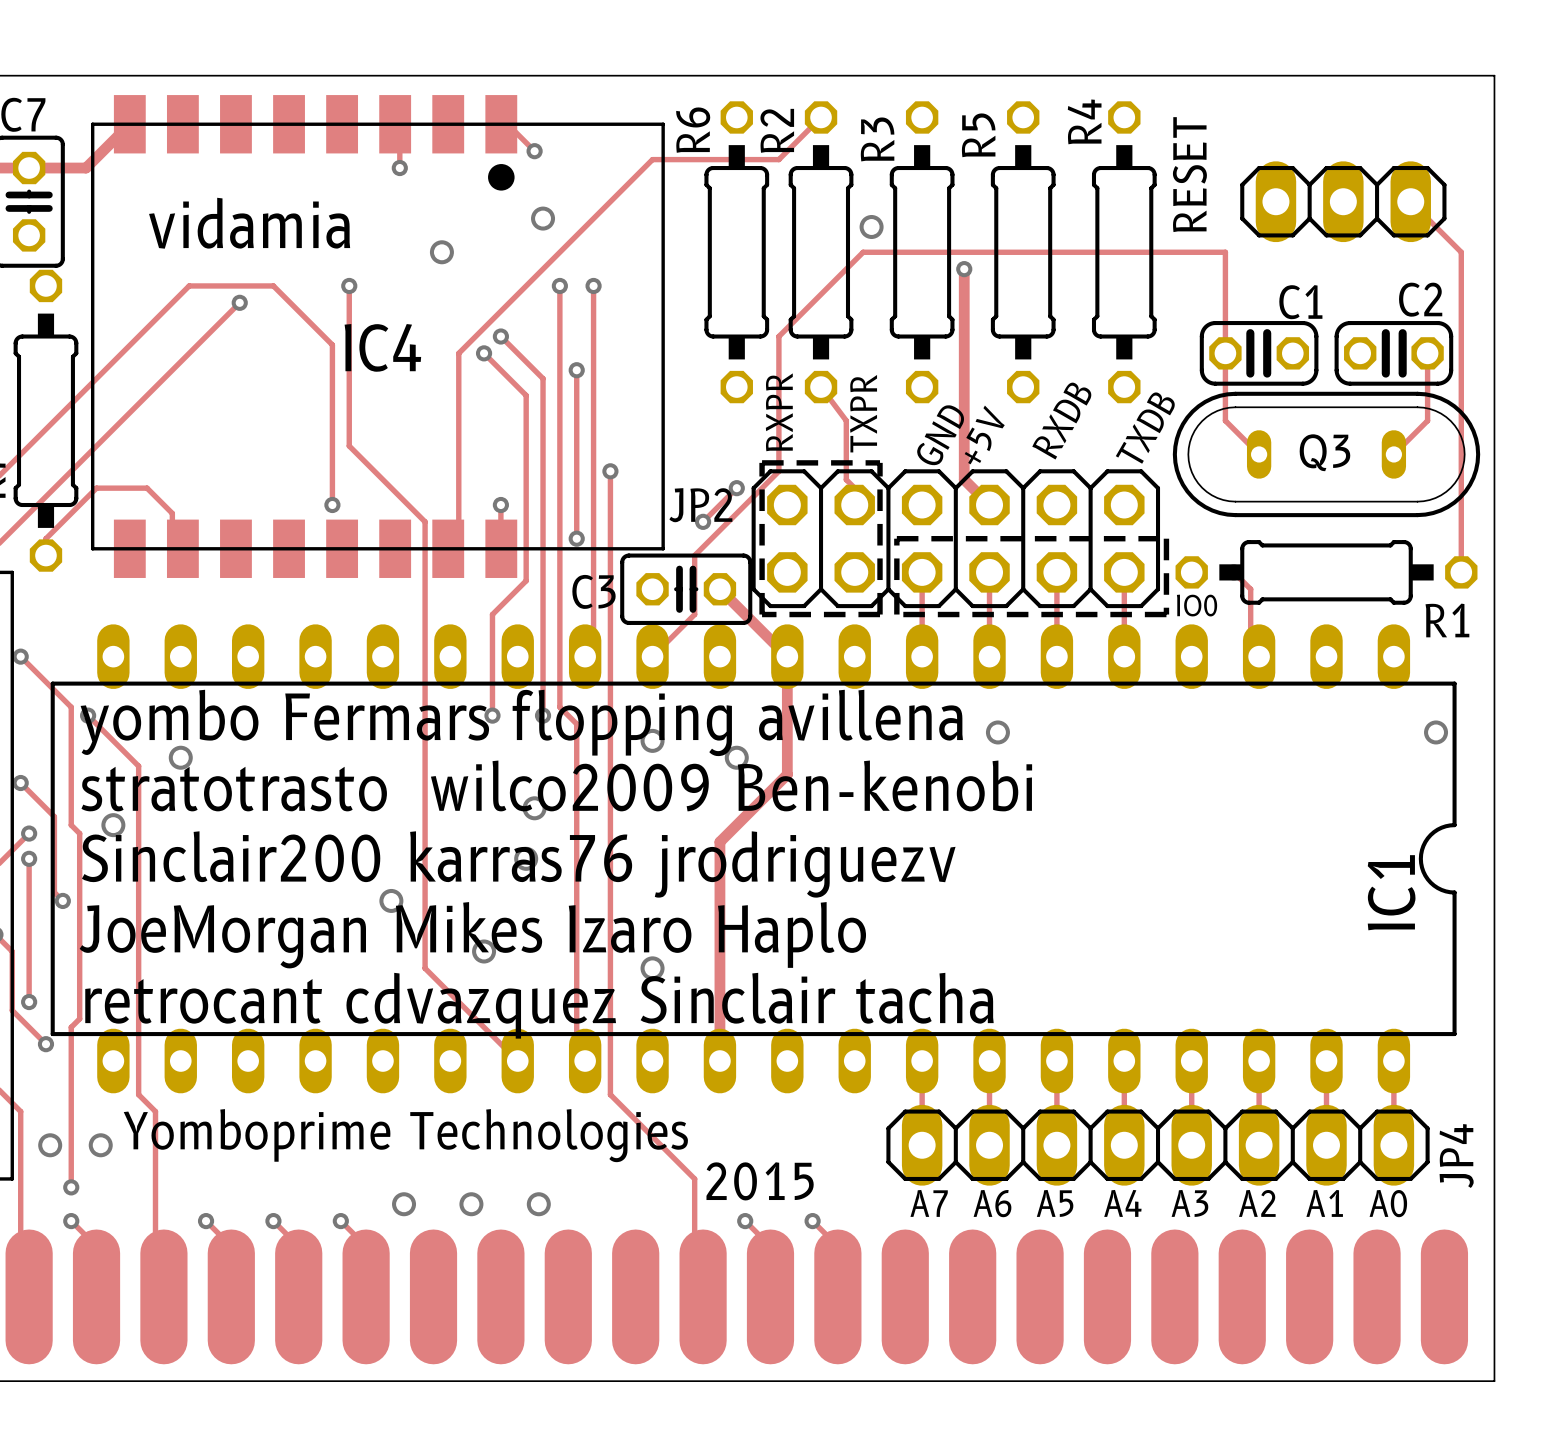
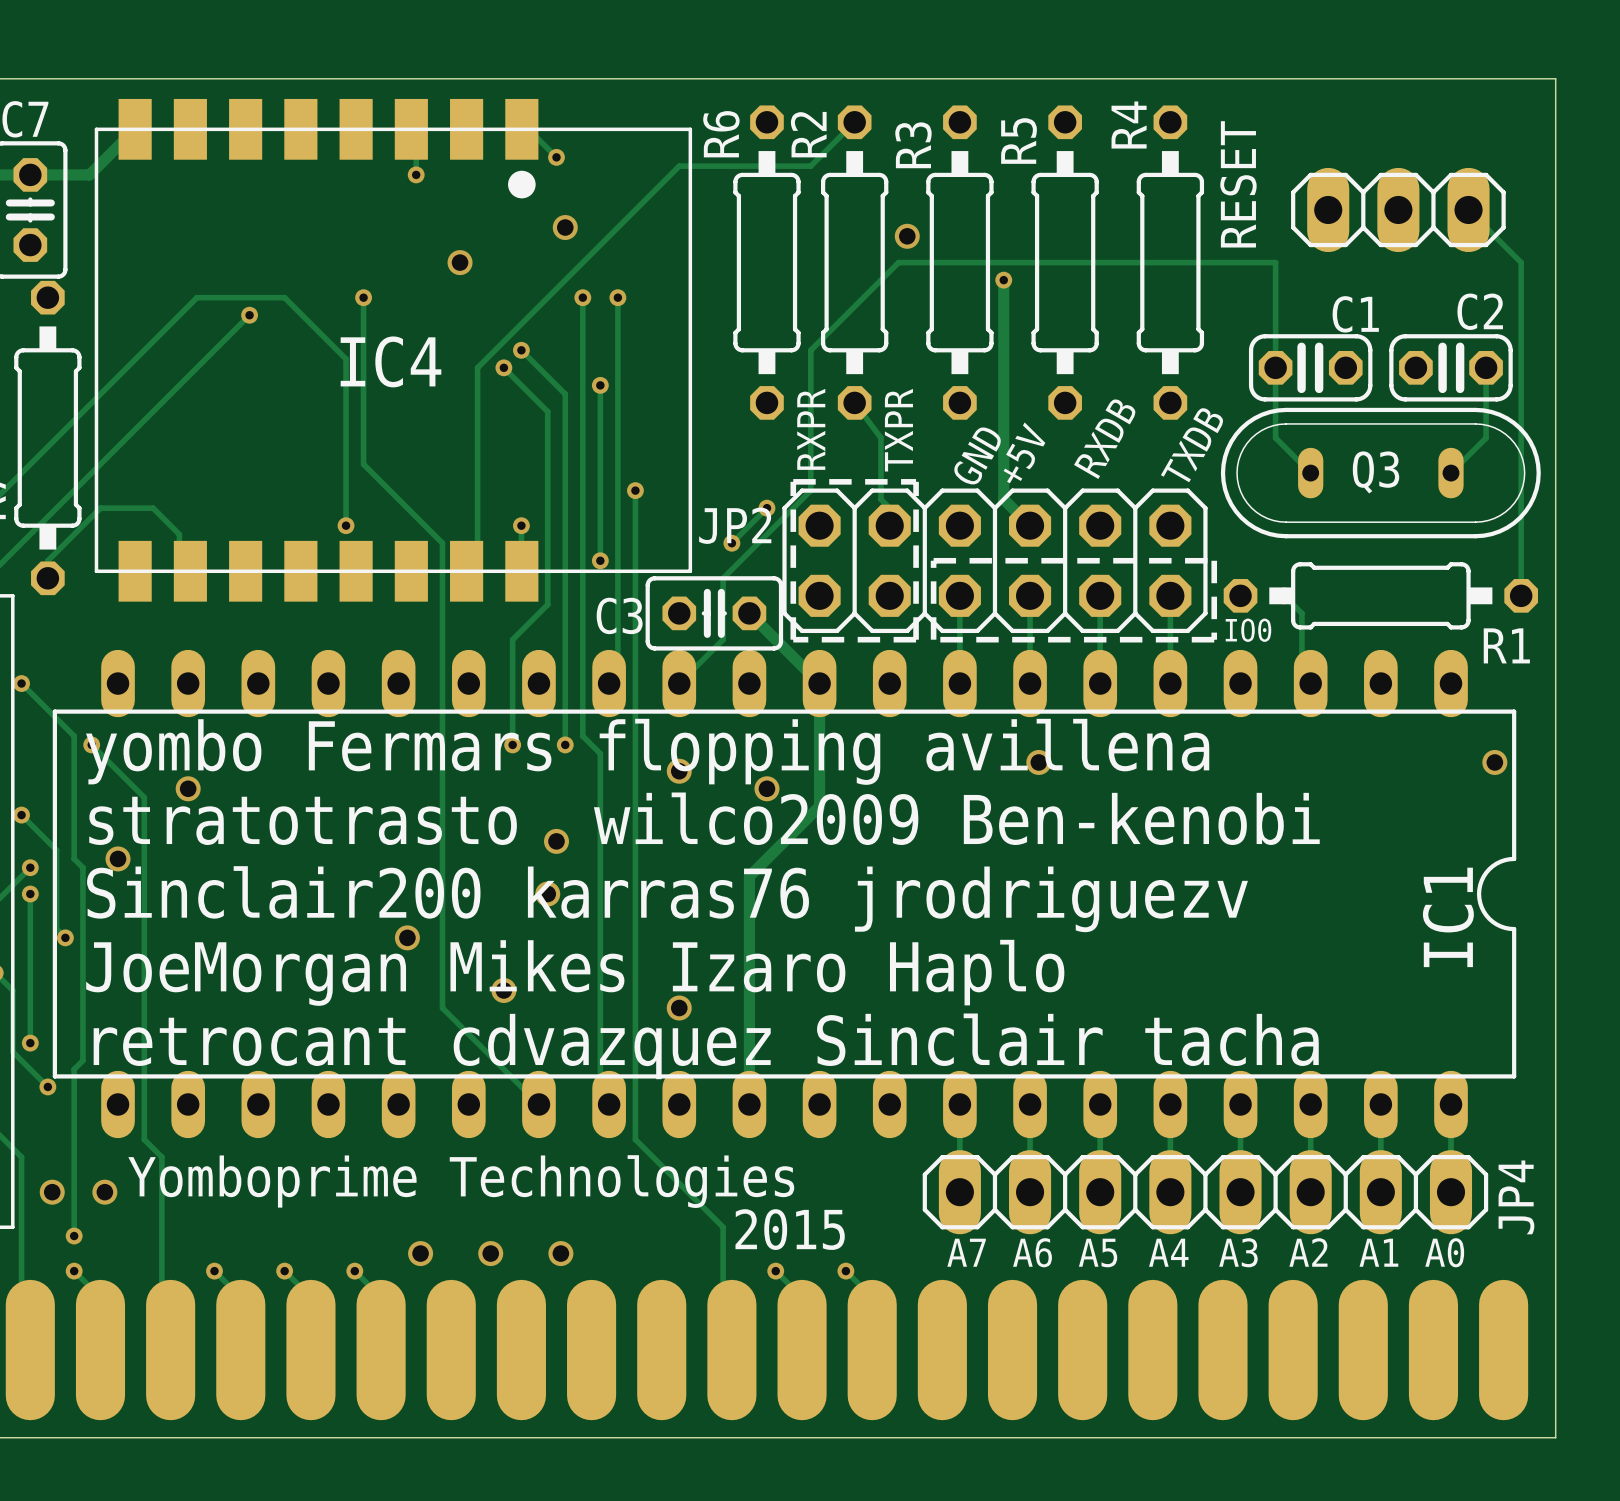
text: vidamia (249, 223) -> none

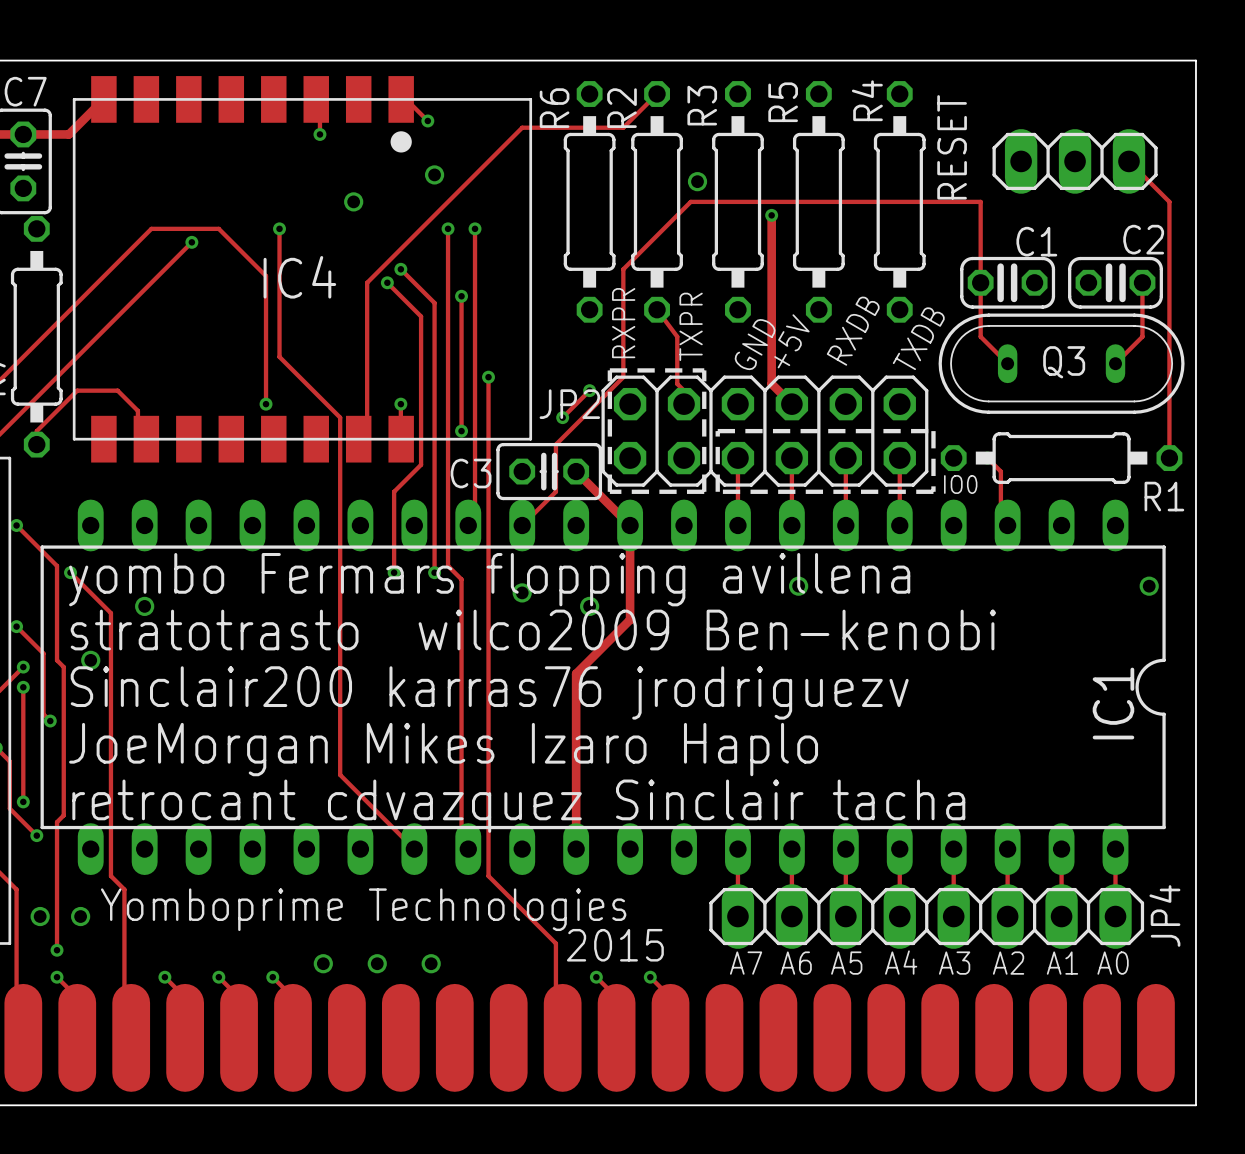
via: (556, 841) -> none
via: (547, 894) -> none
via: (407, 937) -> none
via: (503, 990) -> none
via: (679, 1008) -> none

